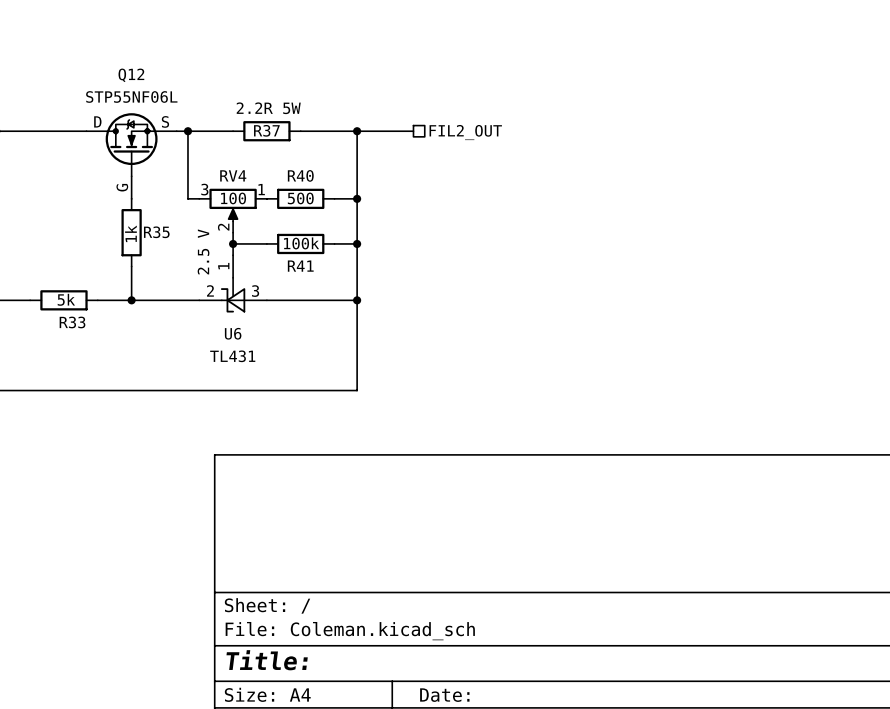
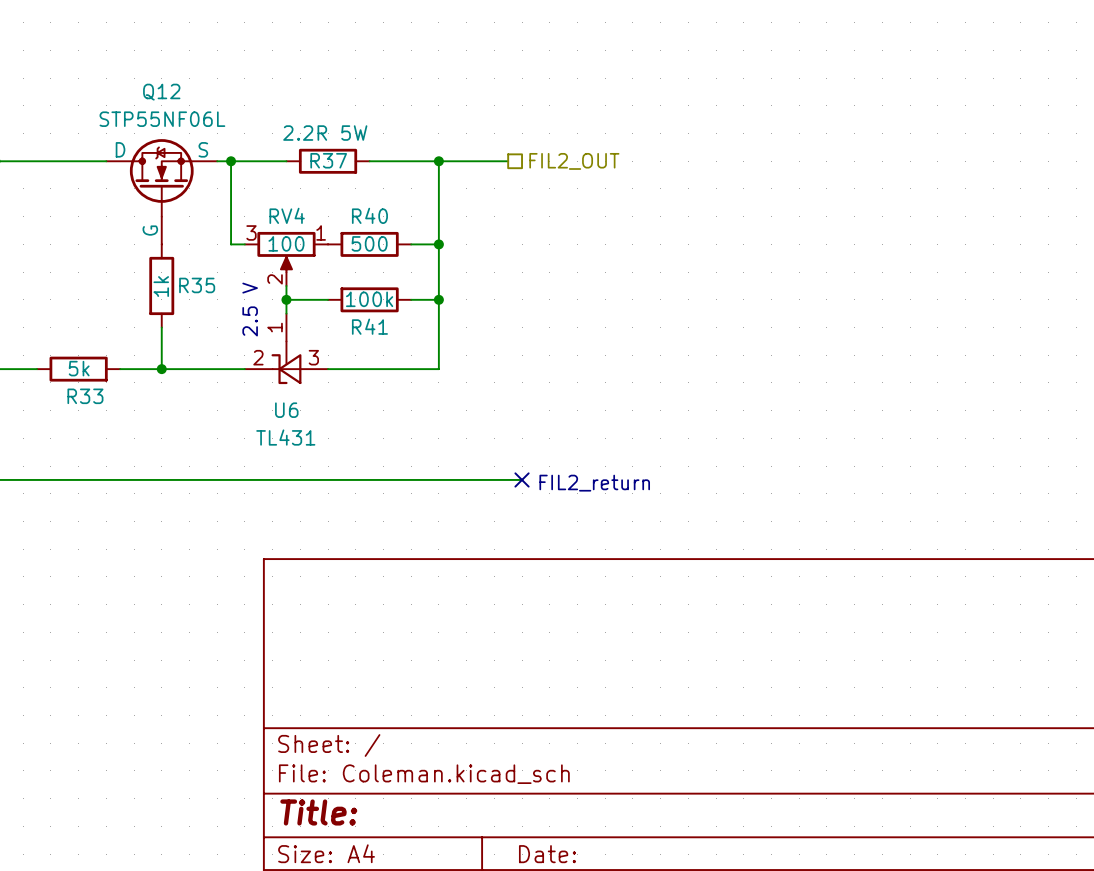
wire: (357, 300) (357, 390) -> (522, 479) (438, 479)
junction: (357, 300) -> none
no-connect mark: none -> (522, 479)
text: none -> FIL2_return (594, 483)

